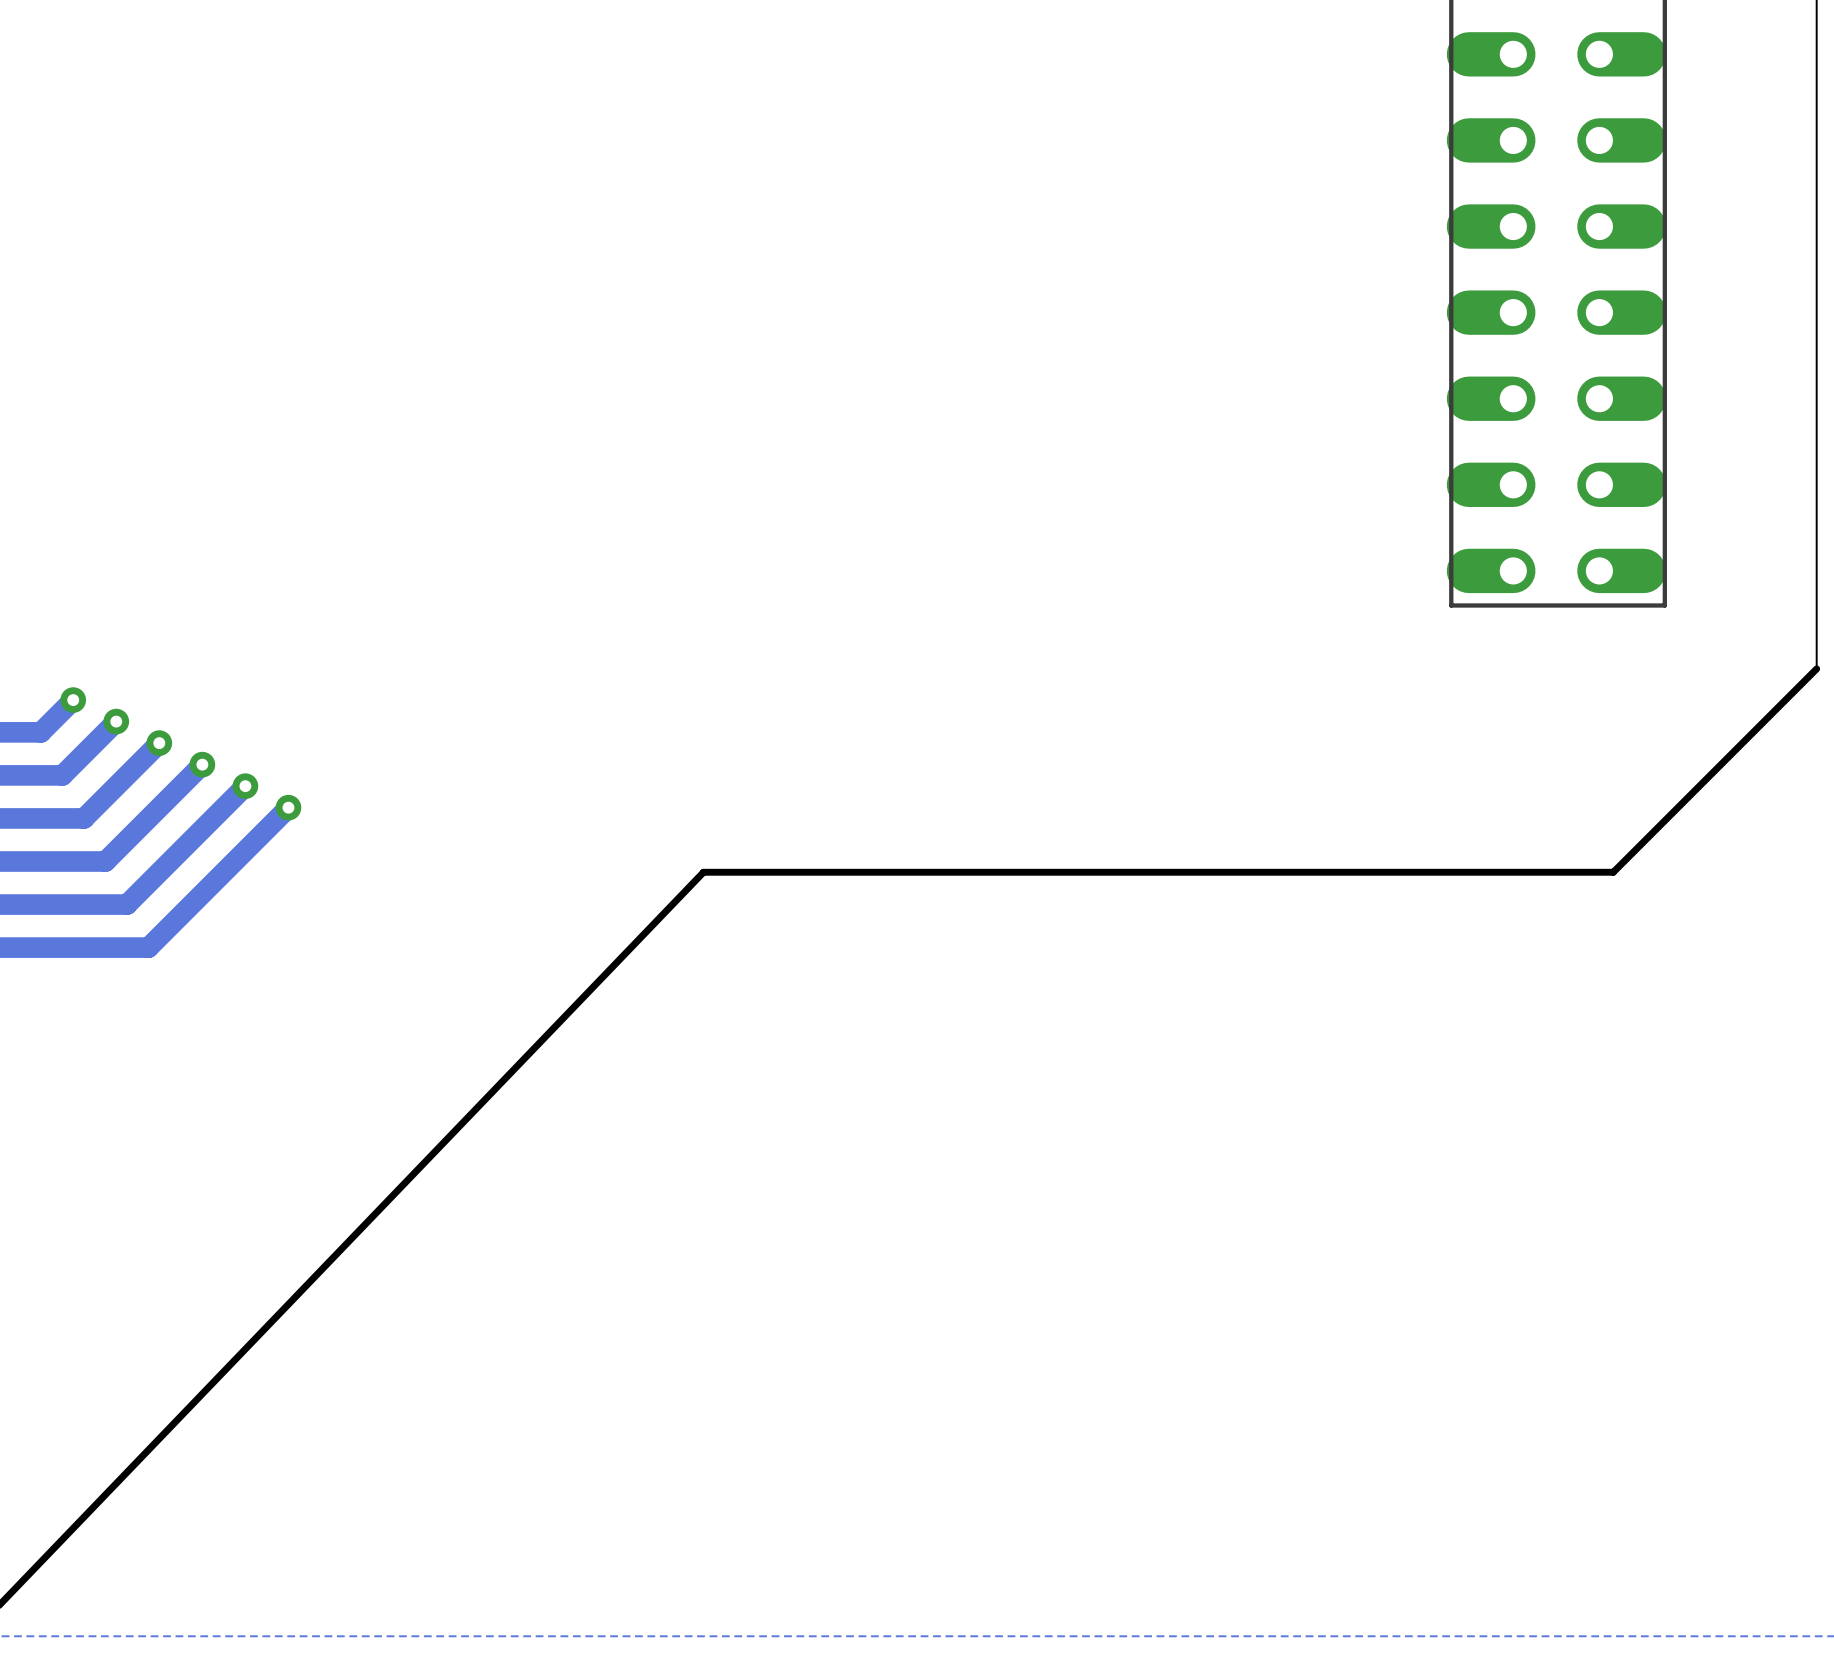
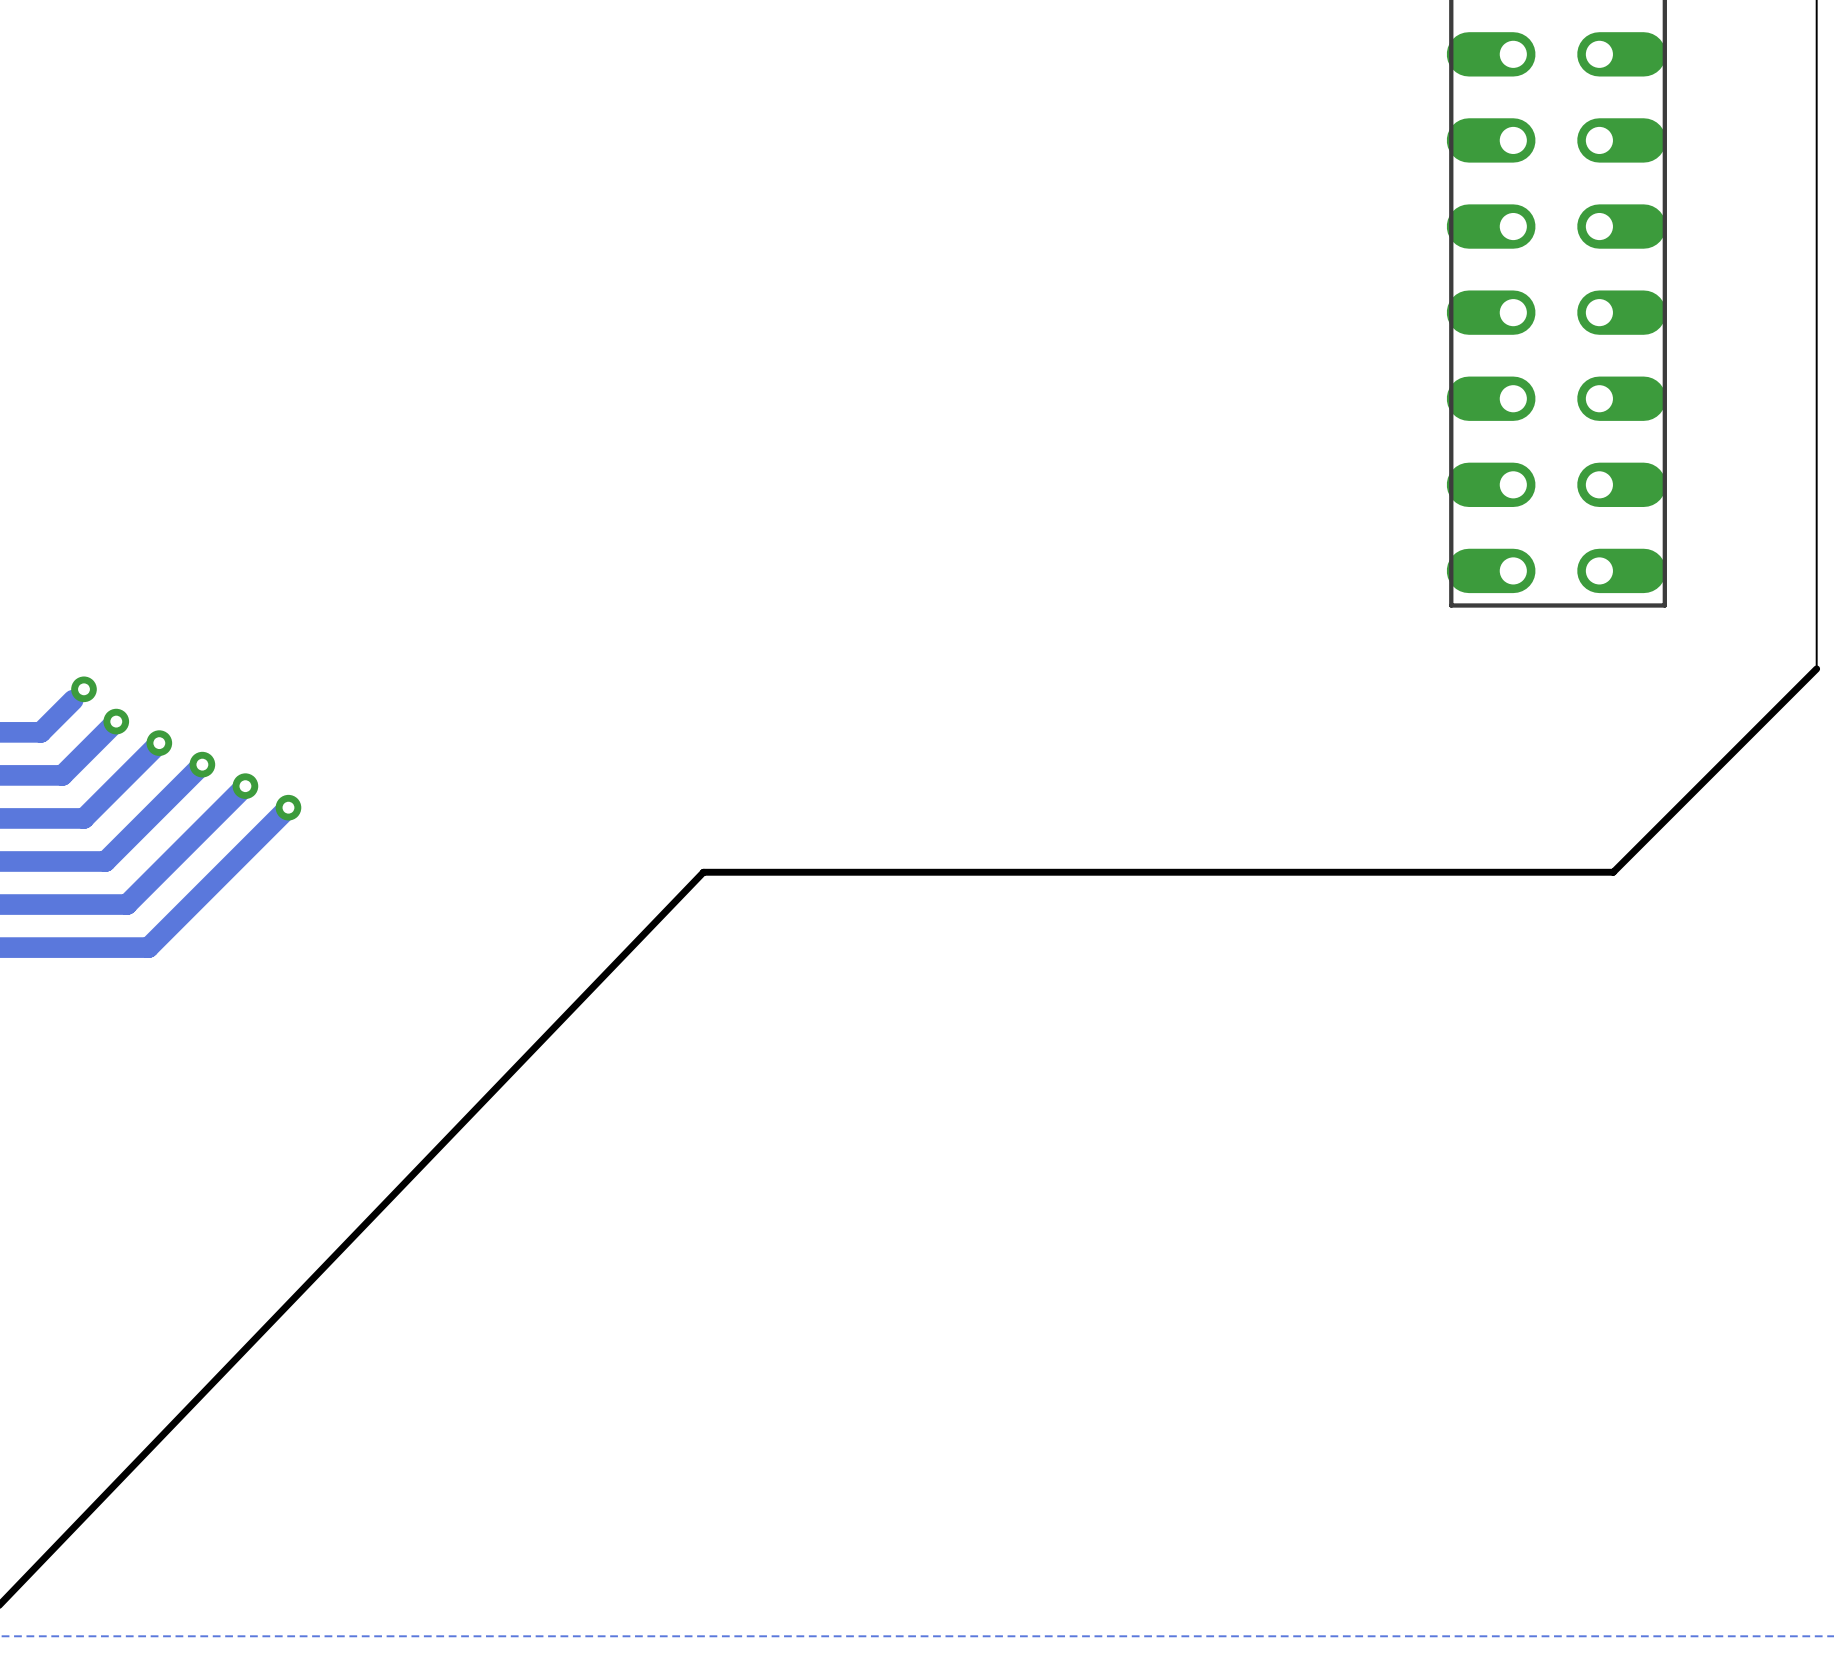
via position: (73, 700) -> (83, 689)

